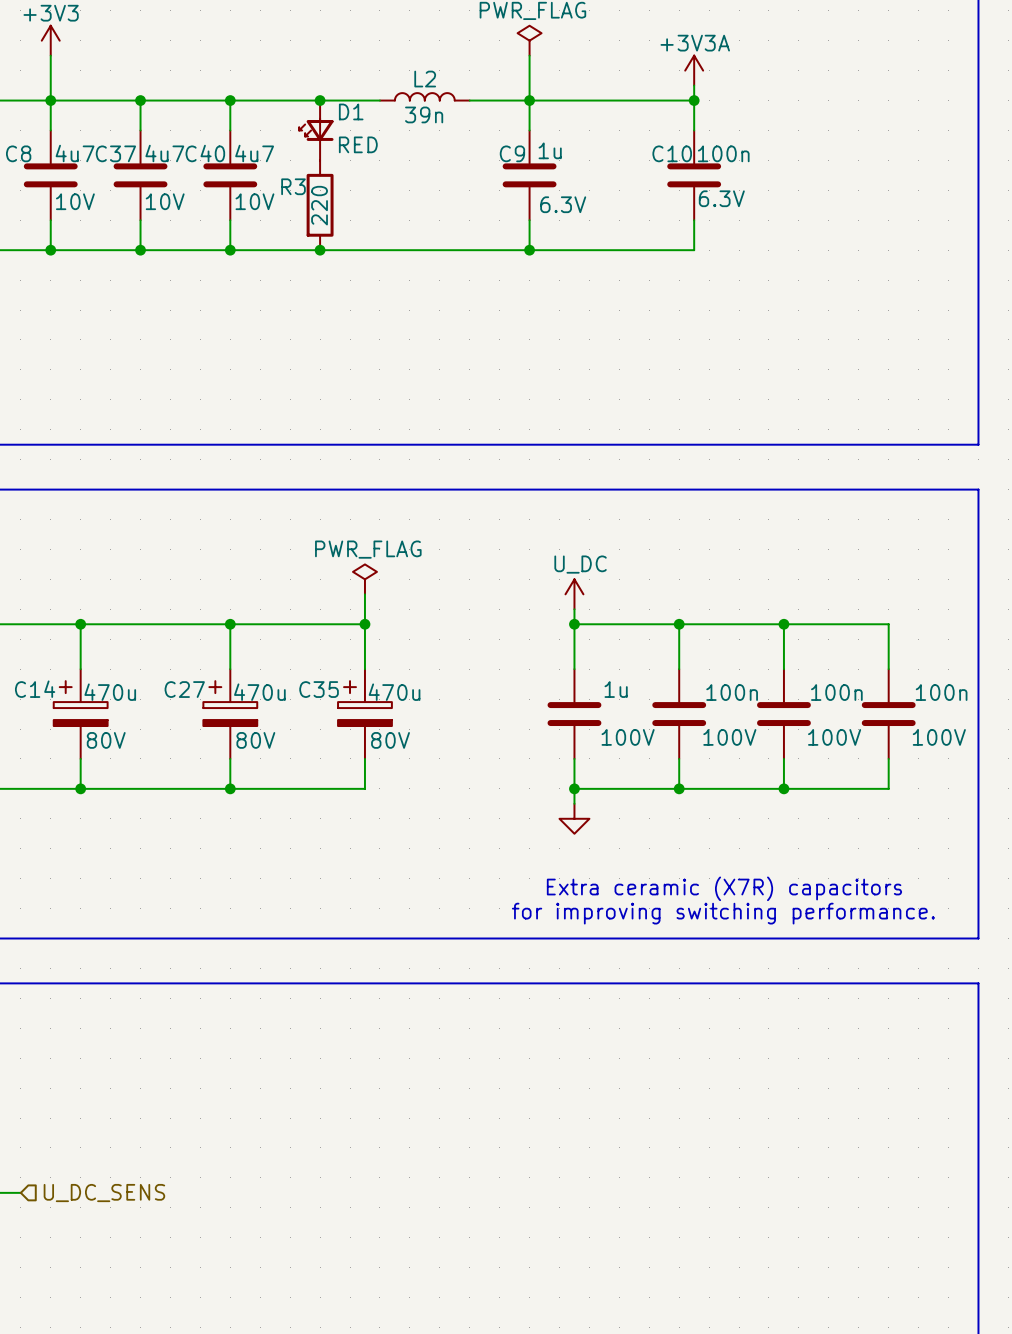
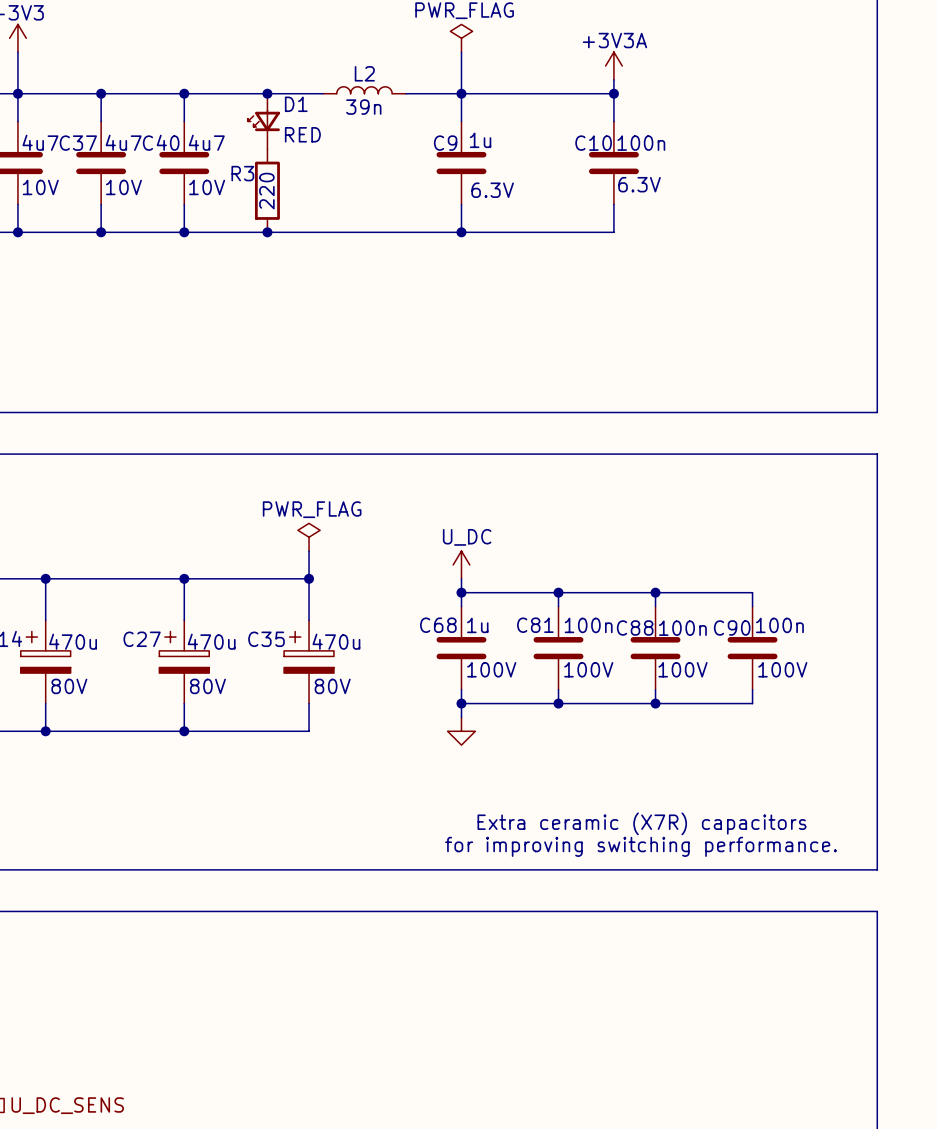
power symbol position: U_DC (574, 594) -> U_DC (461, 564)
wire: (574, 609) (574, 669) -> none
wire: (574, 624) (888, 624) (888, 669) -> none
junction: (574, 624) -> none
wire: (679, 624) (679, 669) -> none
junction: (679, 624) -> none
wire: (783, 624) (783, 669) -> none
junction: (783, 624) -> none
wire: none -> (461, 592) (752, 592) (752, 606)
junction: none -> (461, 592)
wire: none -> (558, 592) (558, 606)
junction: none -> (558, 592)
wire: none -> (655, 592) (655, 606)
junction: none -> (655, 592)
C68: none -> (461, 648)
C81: none -> (558, 648)
C88: none -> (655, 648)
C90: none -> (752, 648)
part: 1u (574, 714) -> none
part: 100n (679, 714) -> none
part: 100n (783, 714) -> none
part: 100n (888, 714) -> none
wire: none -> (558, 689) (558, 703)
wire: none -> (655, 689) (655, 703)
wire: none -> (752, 689) (752, 703) (461, 703)
junction: none -> (461, 703)
wire: (574, 758) (574, 803) -> none
junction: none -> (558, 703)
wire: (679, 758) (679, 788) -> (461, 689) (461, 717)
junction: none -> (655, 703)
wire: (783, 758) (783, 788) -> (461, 578) (461, 606)
wire: (888, 758) (888, 788) (574, 788) -> none
junction: (574, 788) -> none
junction: (679, 788) -> none
junction: (783, 788) -> none
power symbol position: (574, 818) -> (461, 731)

